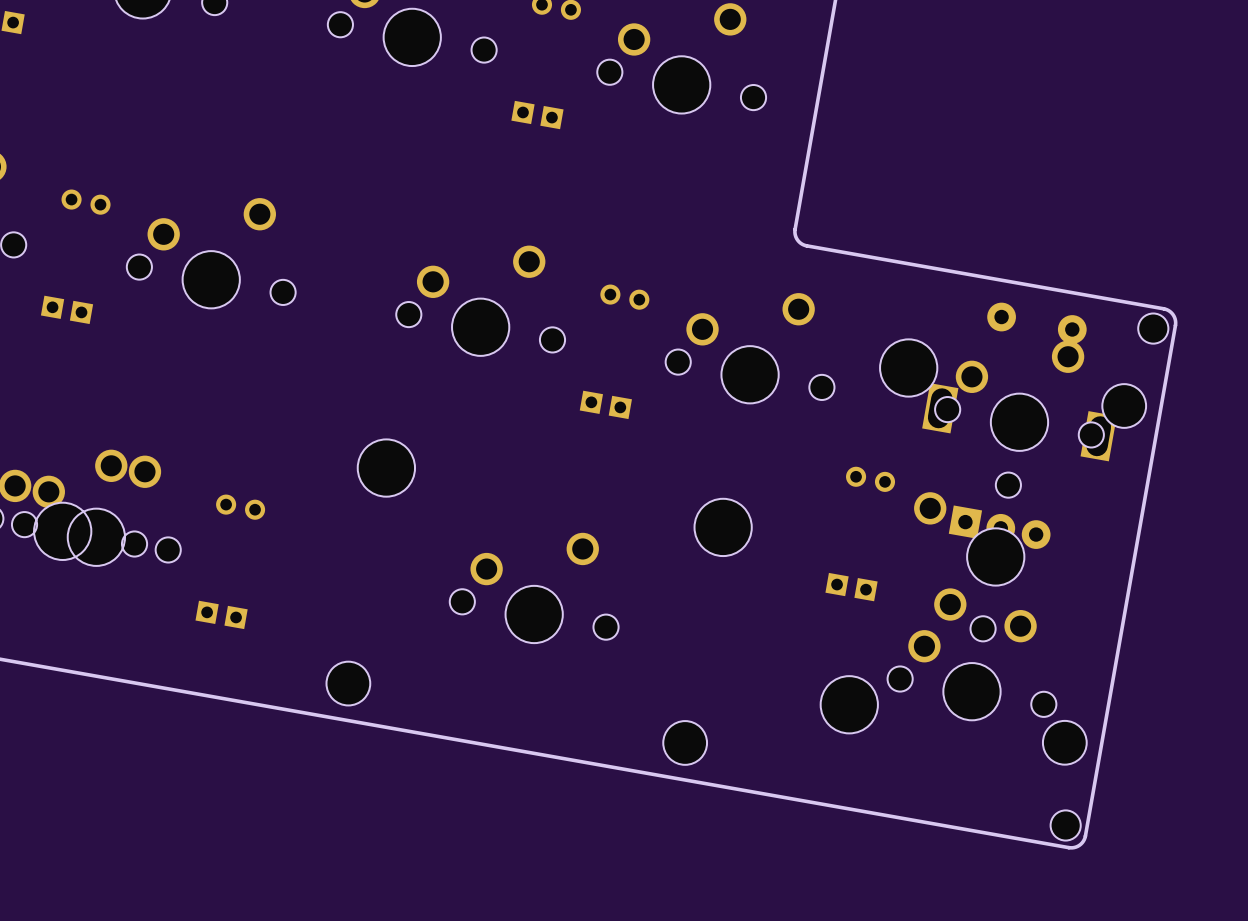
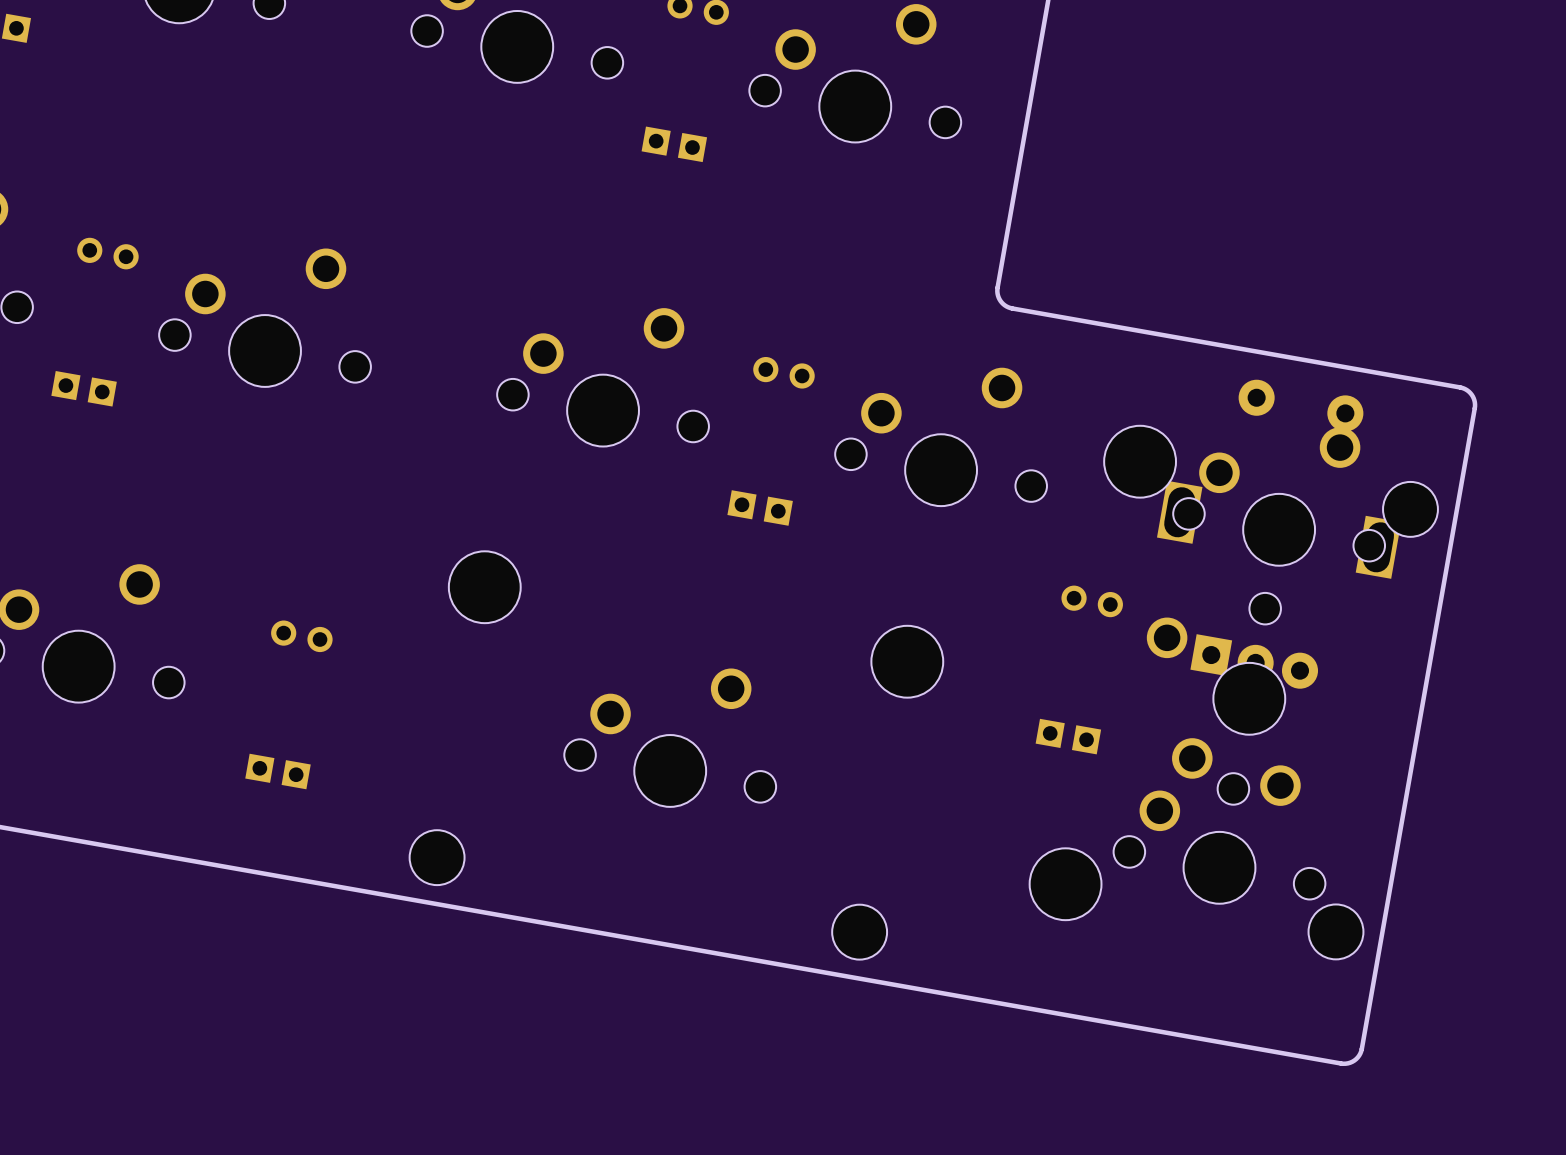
part: (1153, 328) -> none
part: (96, 510) -> none
part: (1065, 825) -> none

